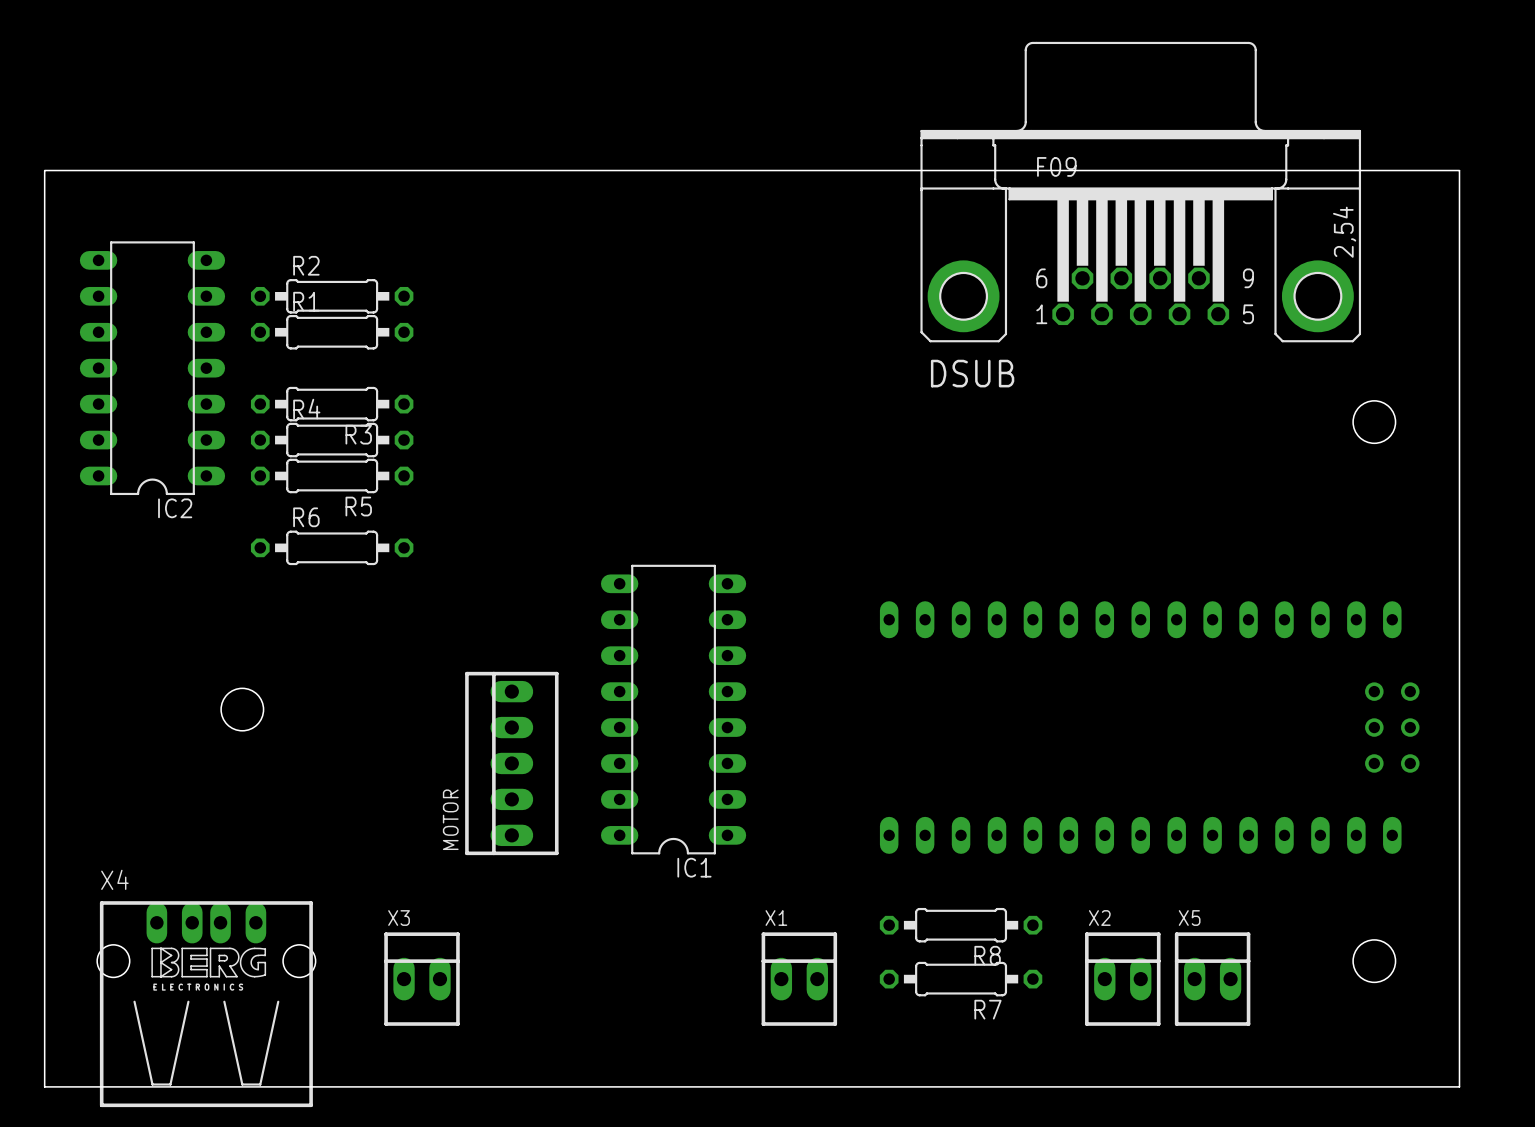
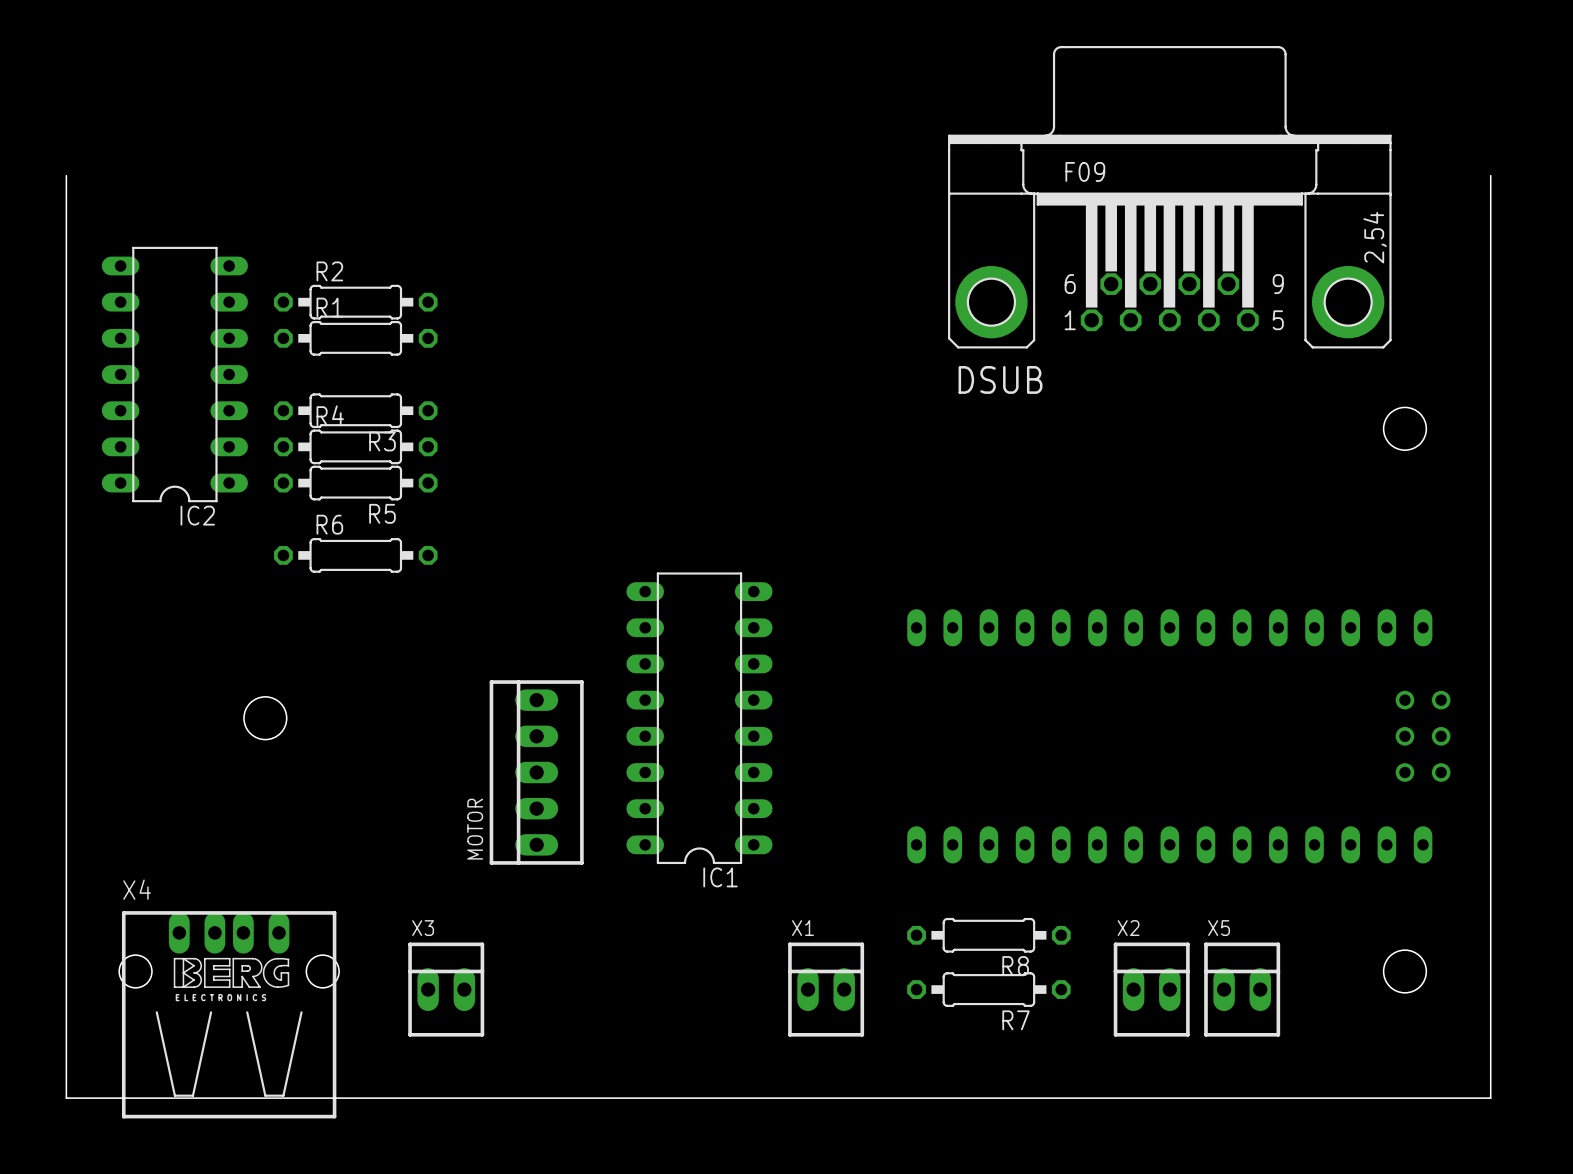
board edge: (44, 170) (1459, 170) -> none

